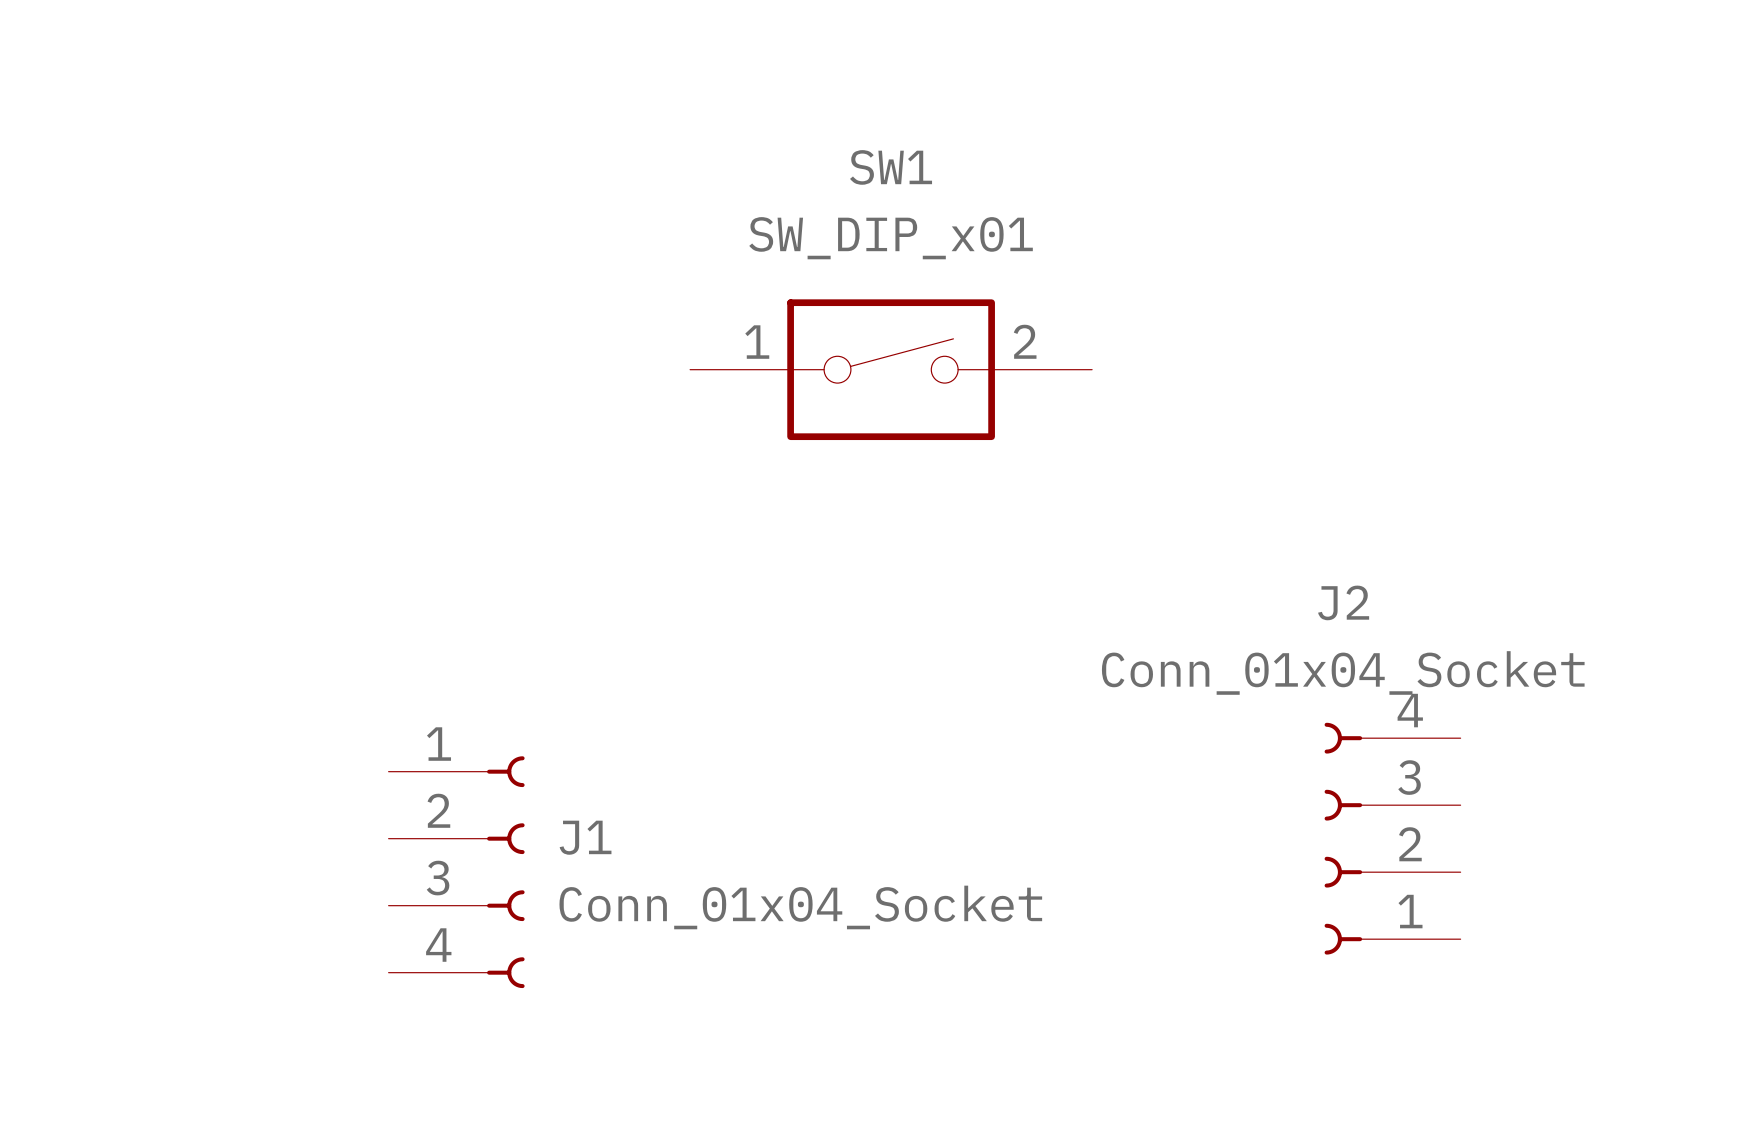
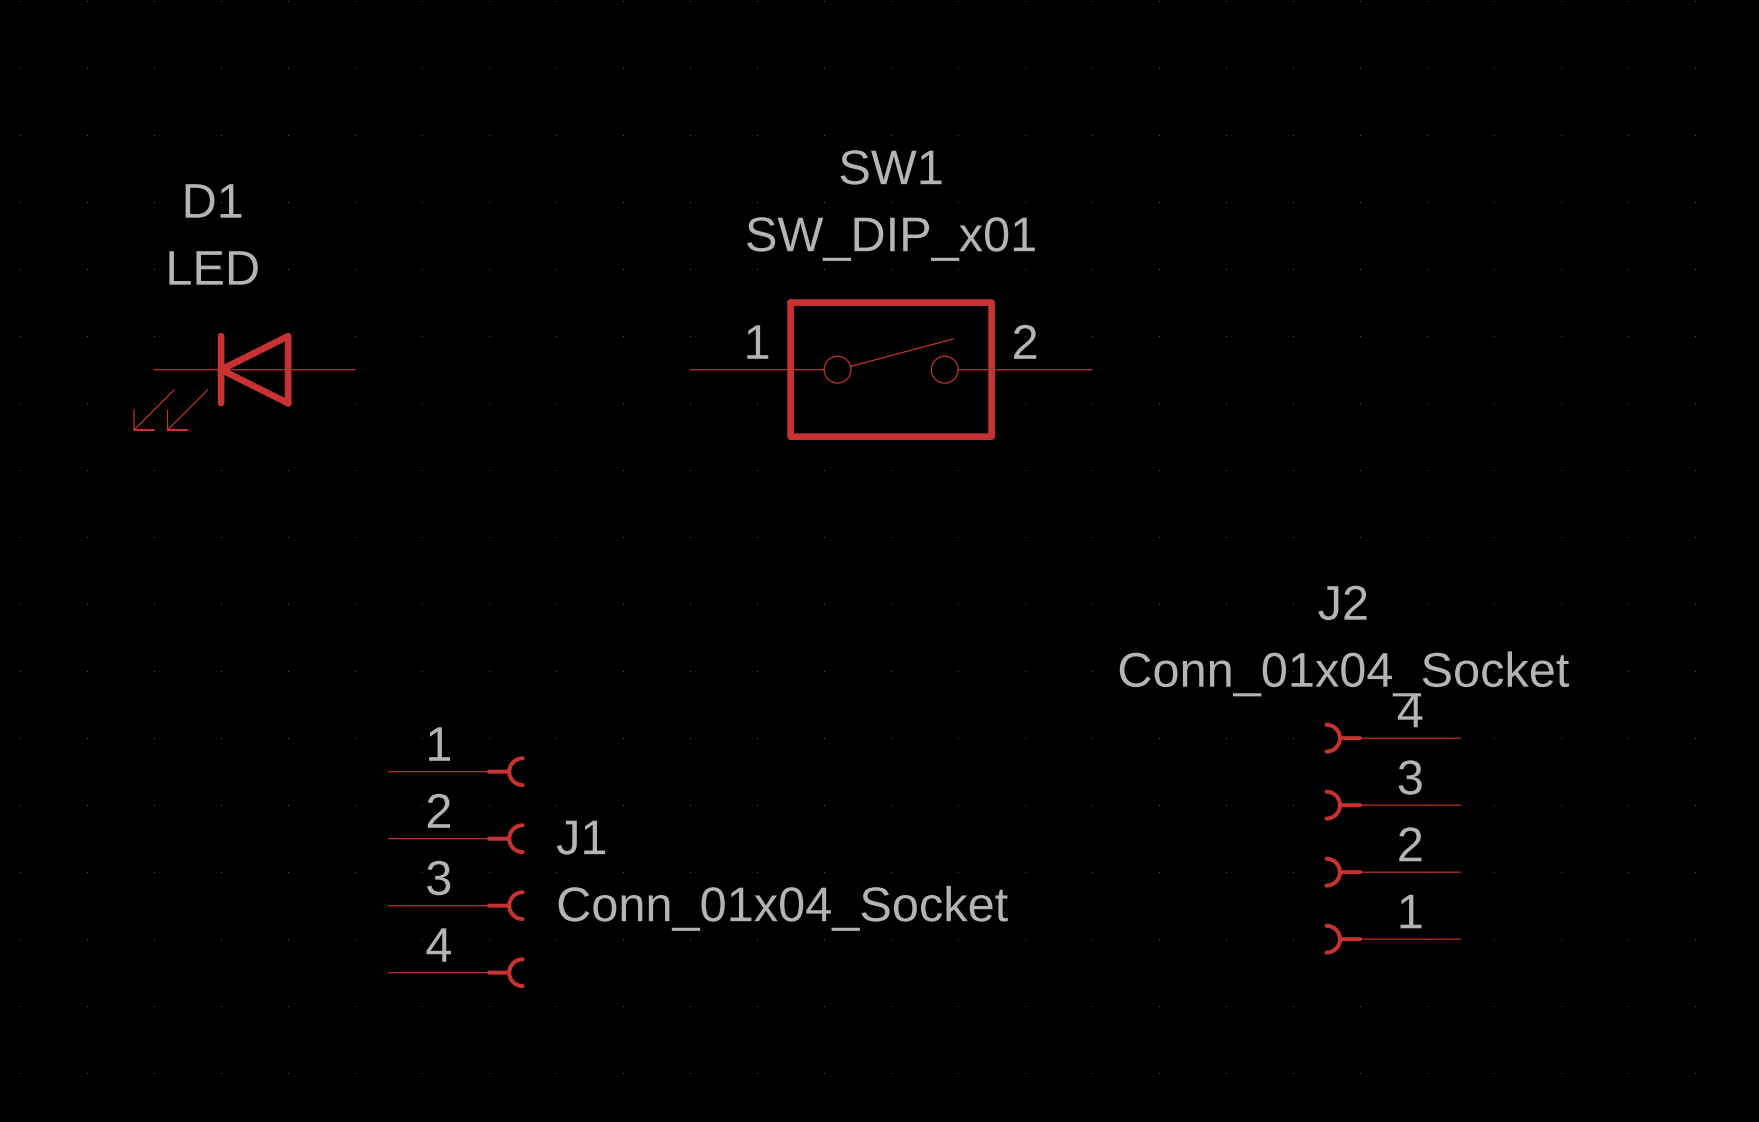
D1: none -> LED (244, 381)

